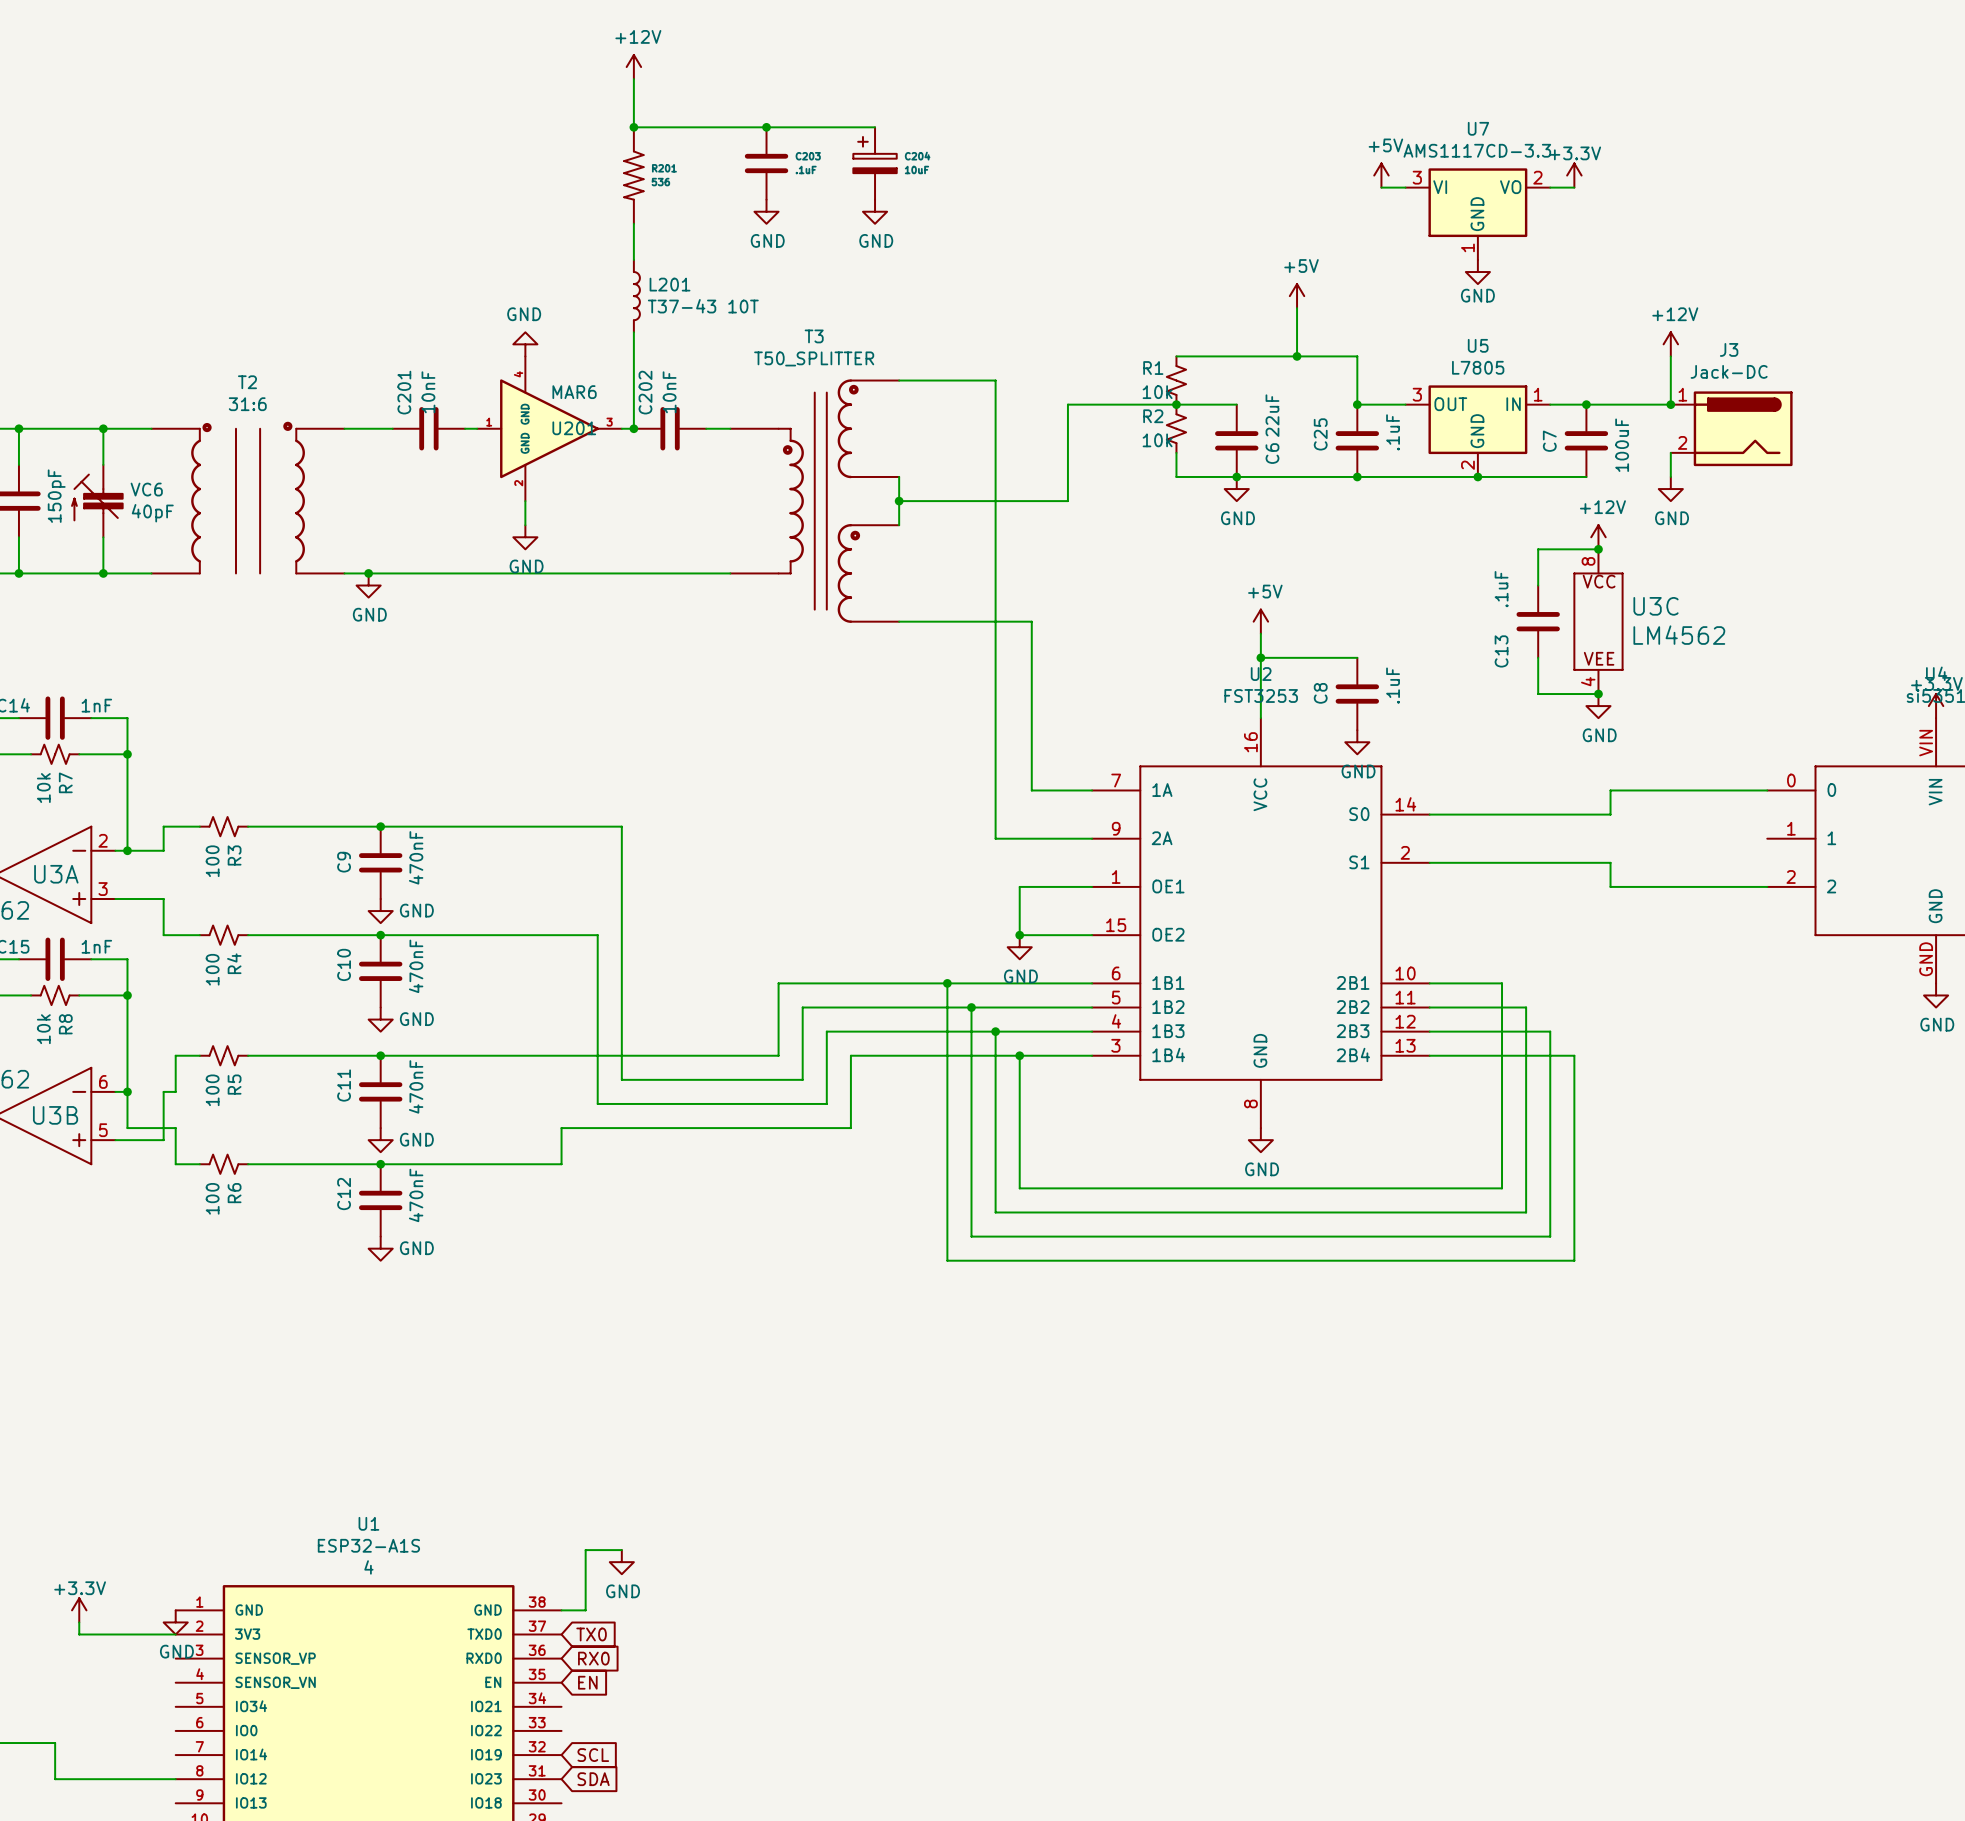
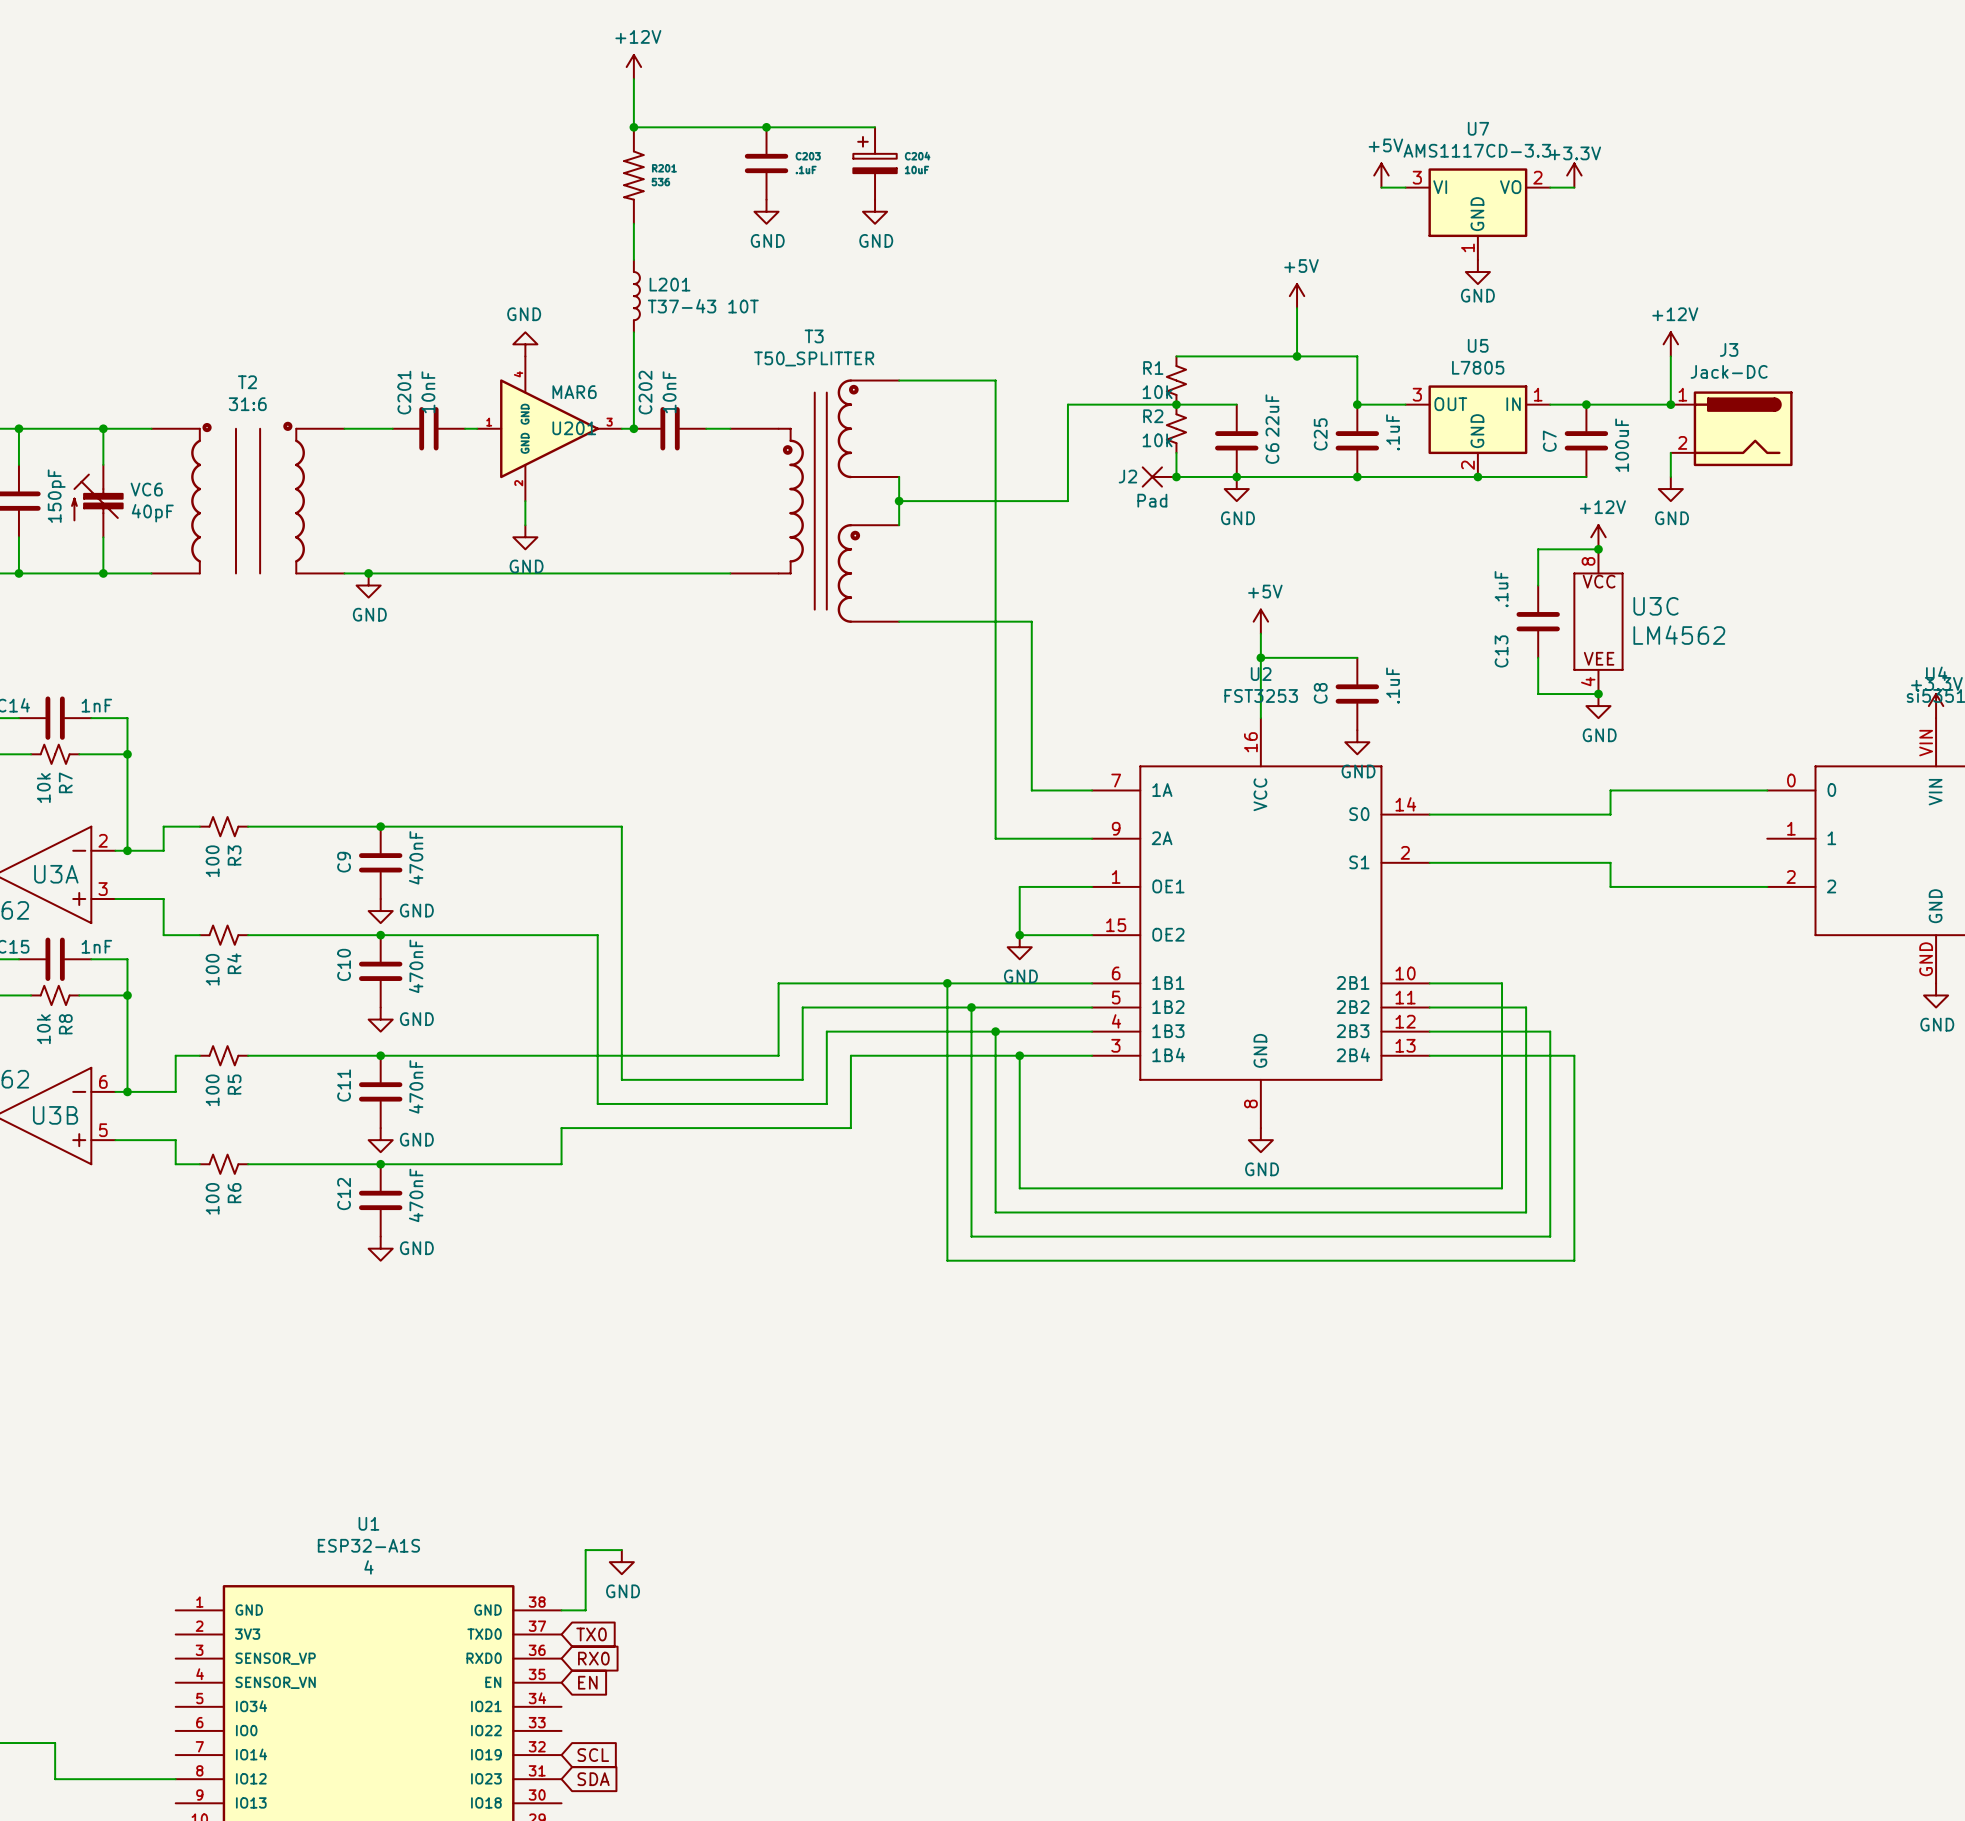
J2: none -> Pad (1159, 476)
junction: none -> (1176, 476)
wire: (127, 1091) (127, 1128) (175, 1128) (175, 1140) -> (127, 1091) (163, 1091)
wire: (163, 1091) (163, 1140) -> (175, 1140) (163, 1140)
power symbol: +3.3V (79, 1610) -> none
wire: (79, 1622) (79, 1634) (175, 1634) -> none
power symbol: GND (175, 1622) -> none

